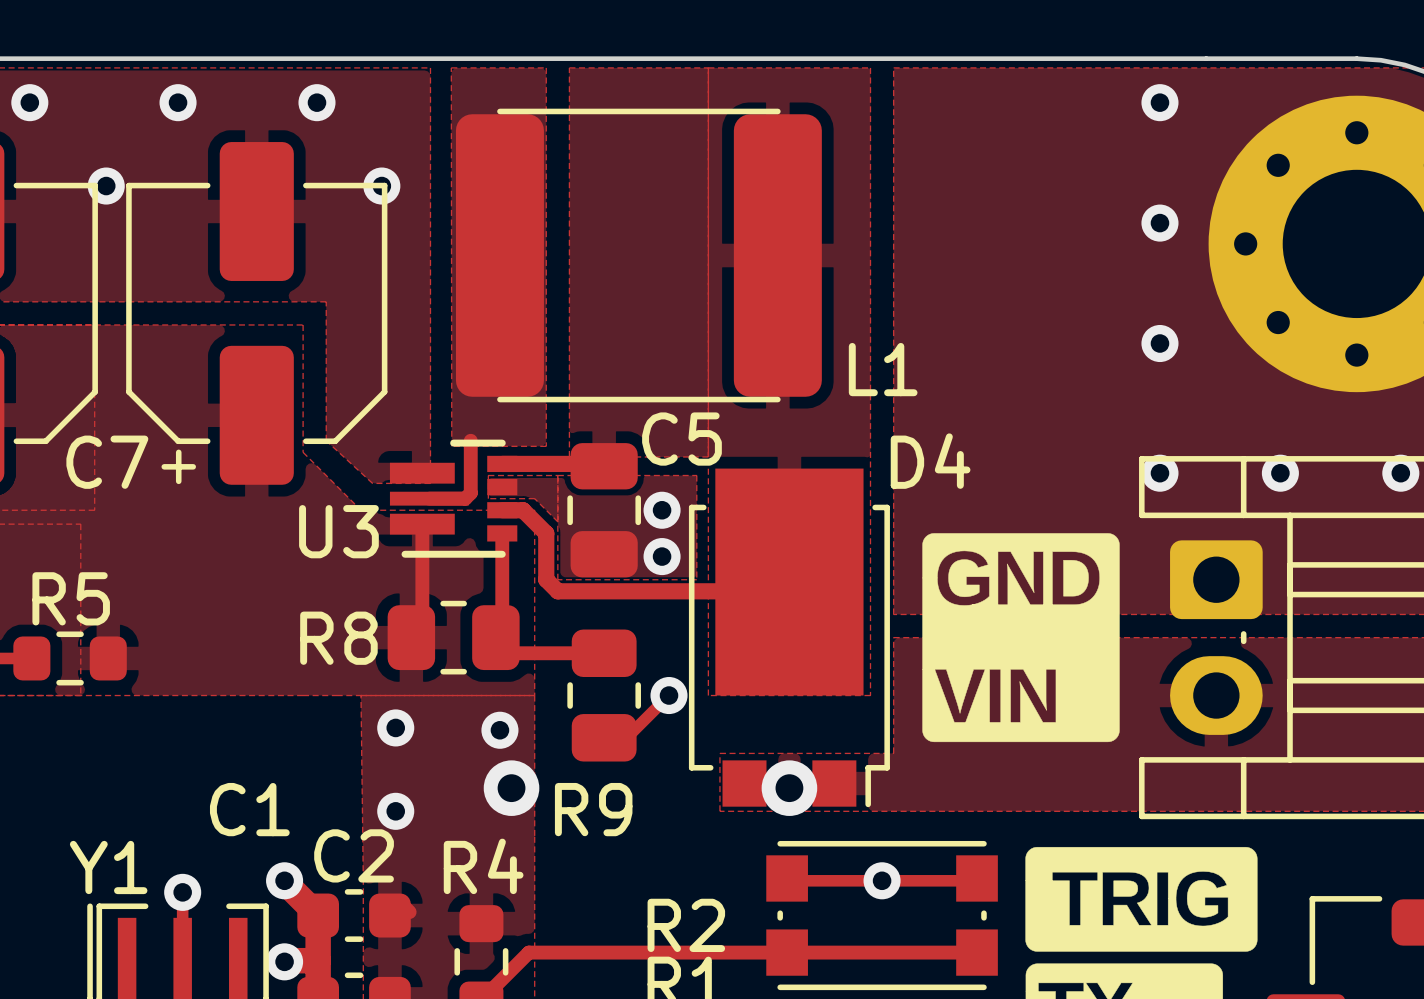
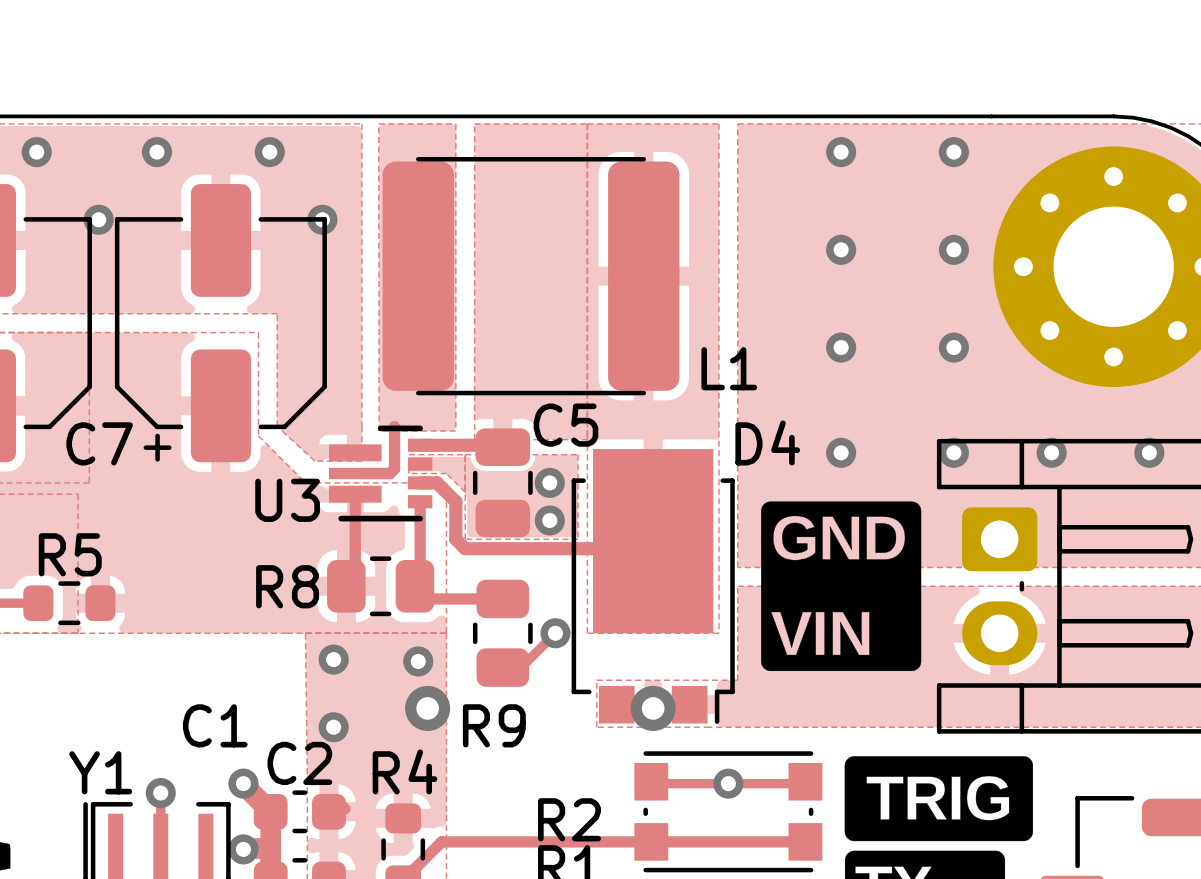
via: none -> (841, 152)
via: none -> (841, 249)
via: none -> (841, 347)
via: none -> (841, 452)

